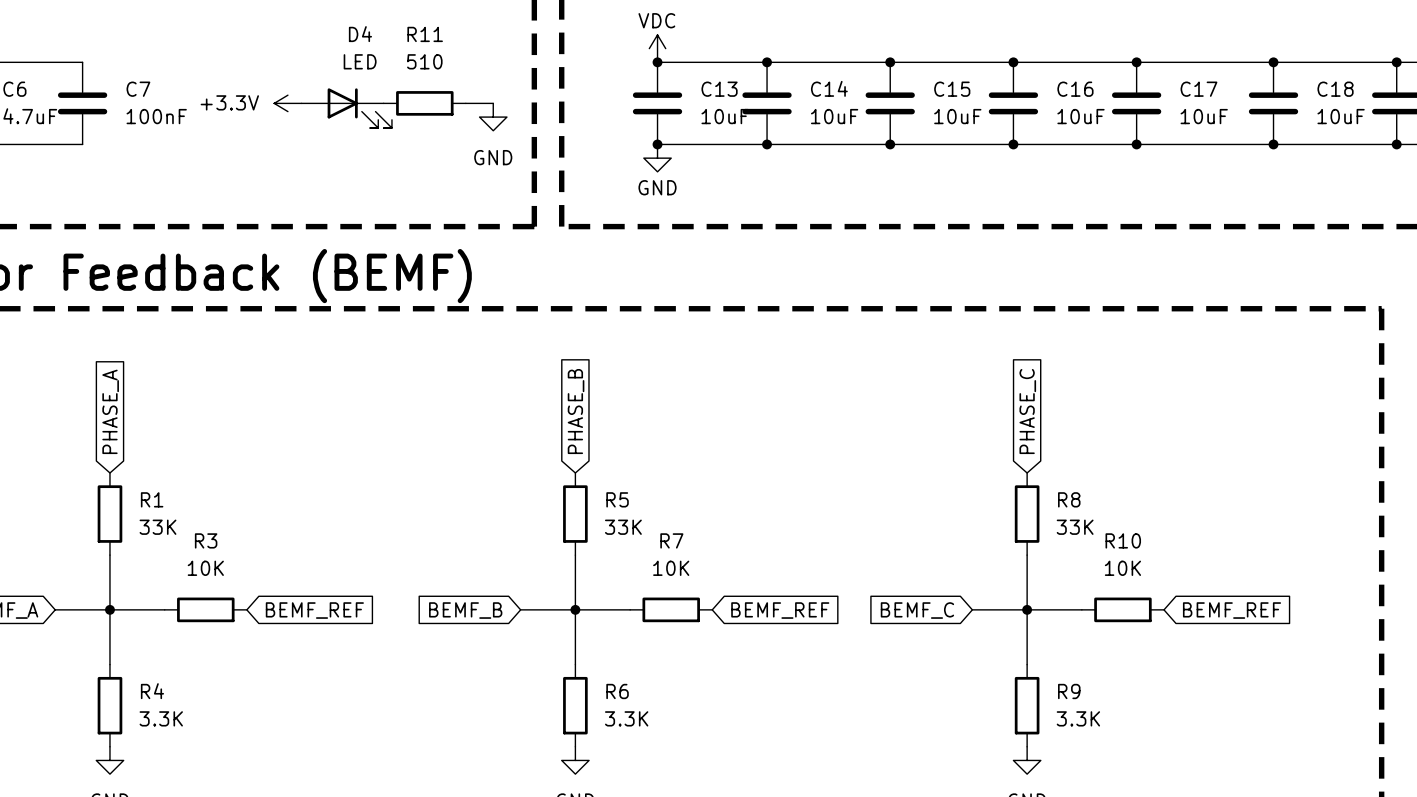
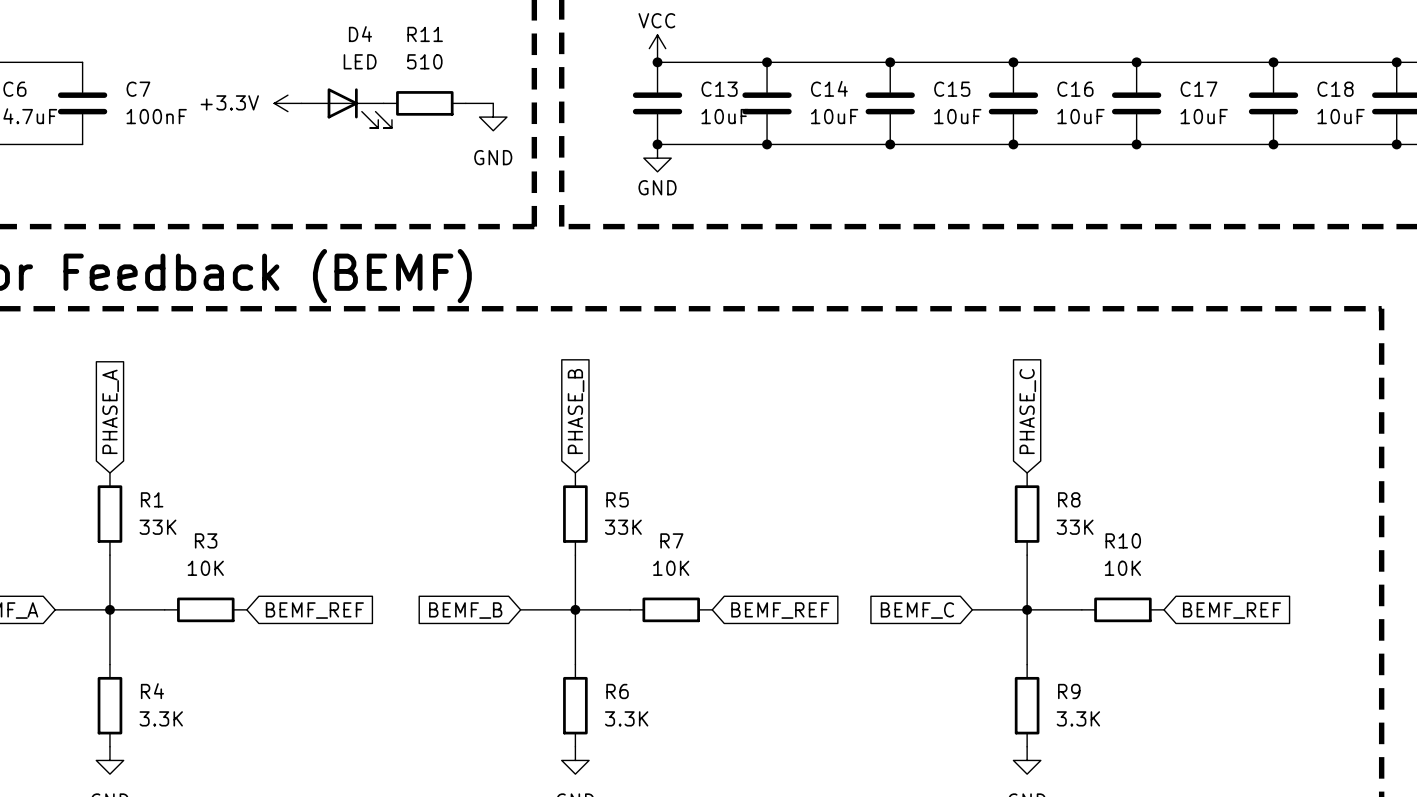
power symbol: VDC (657, 48) -> VCC (657, 48)

